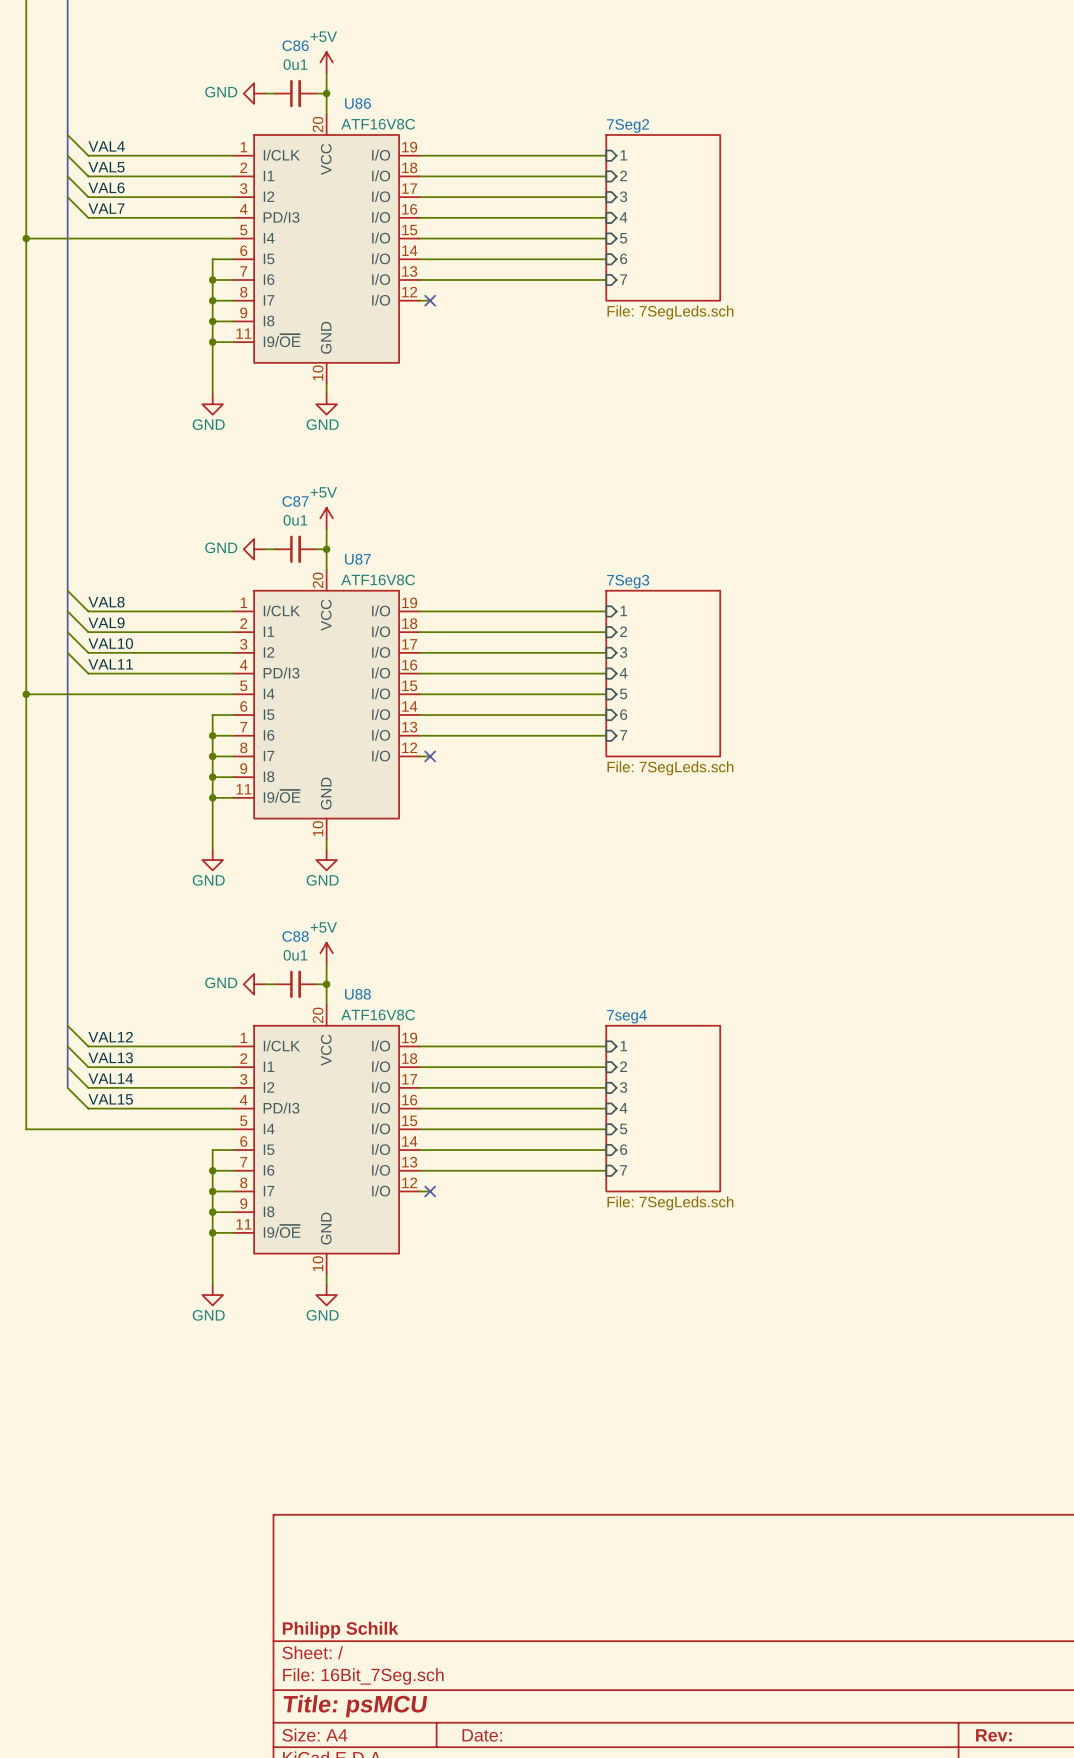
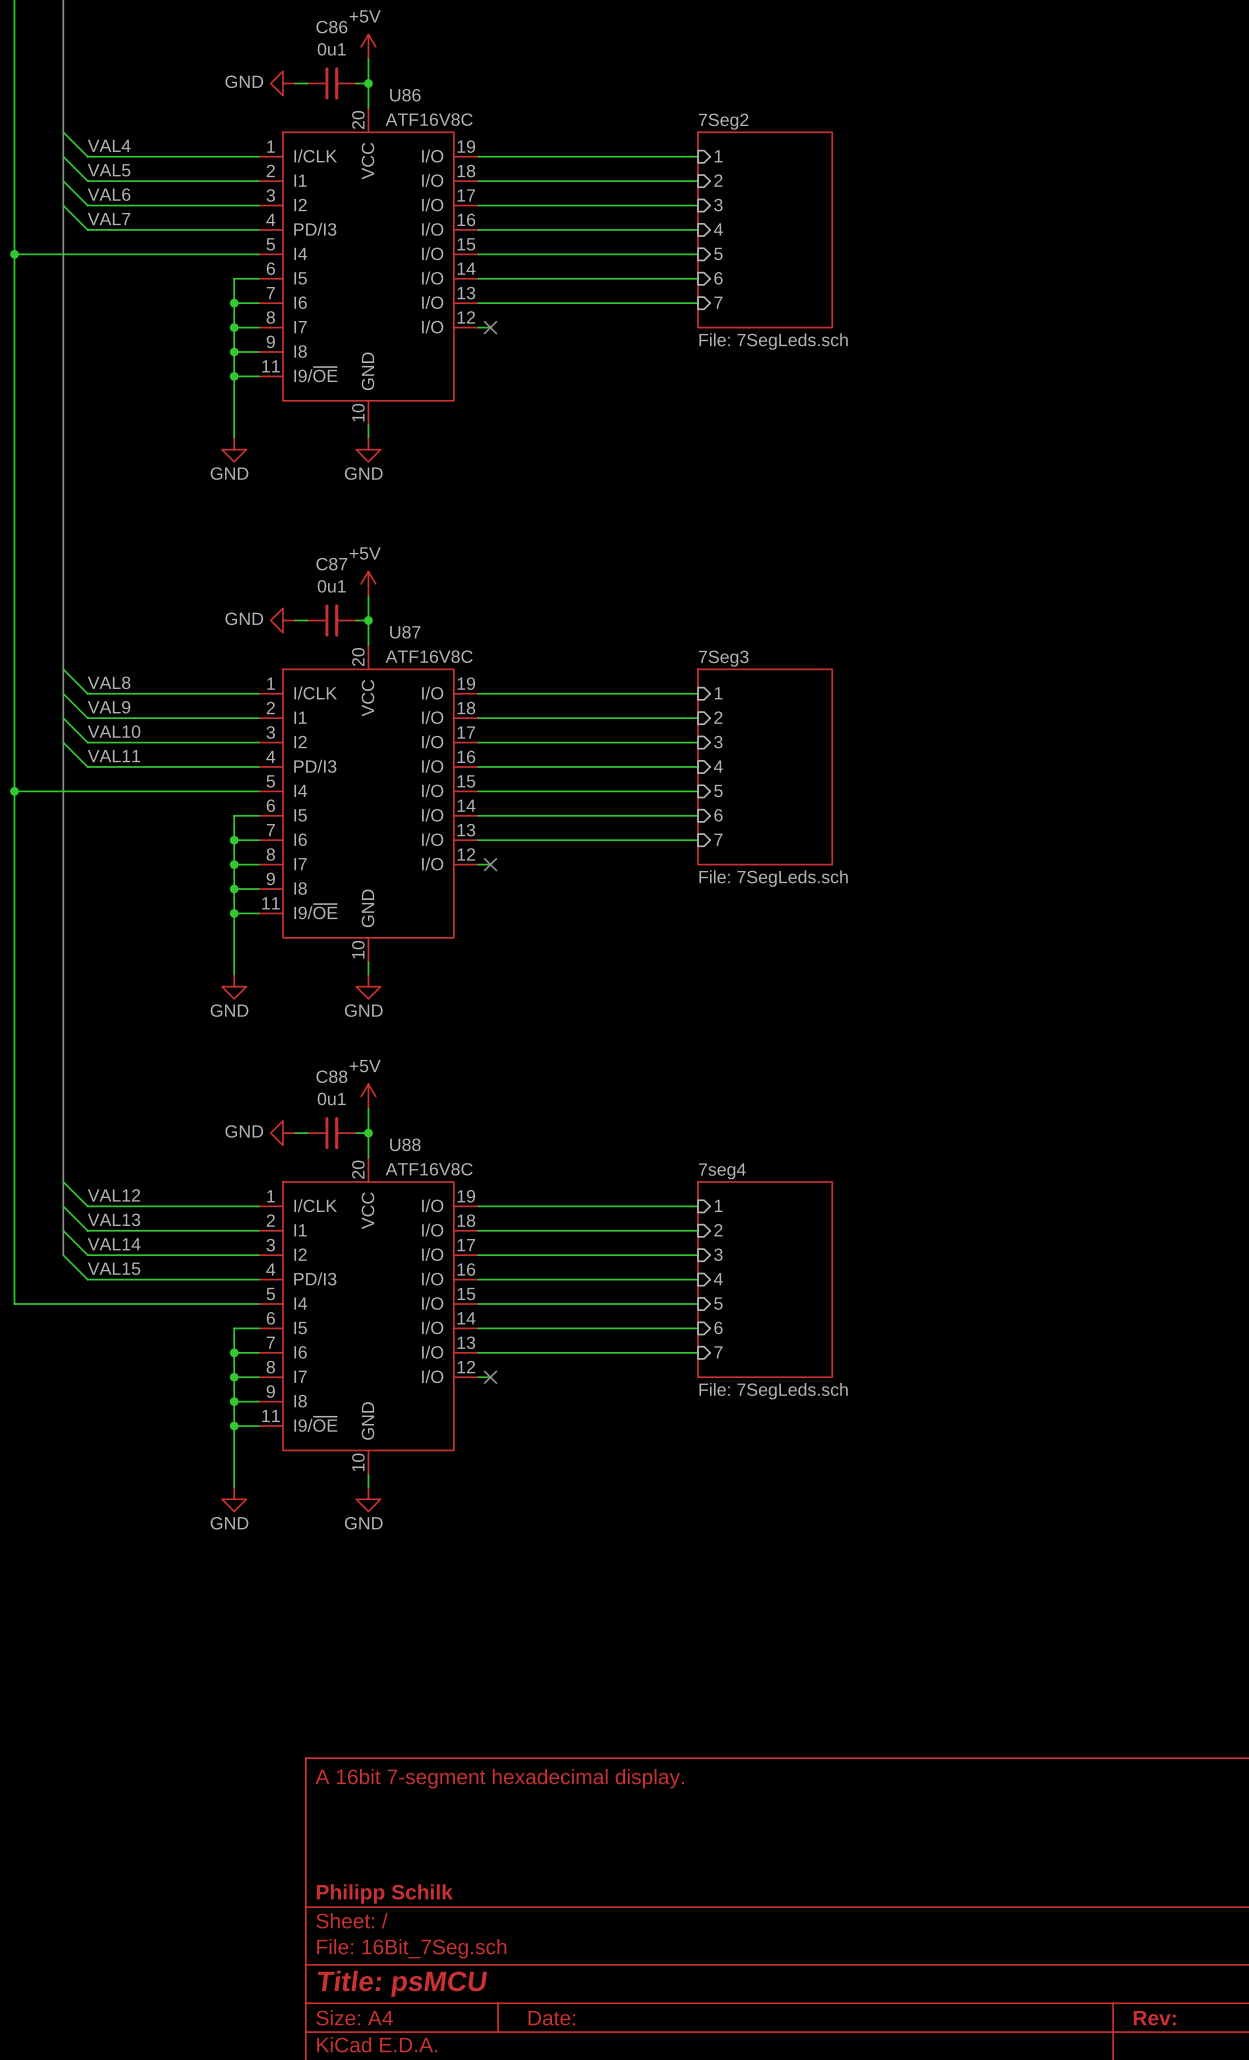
title block: none -> A 16bit 7-segment hexadecimal display. (499, 1778)

